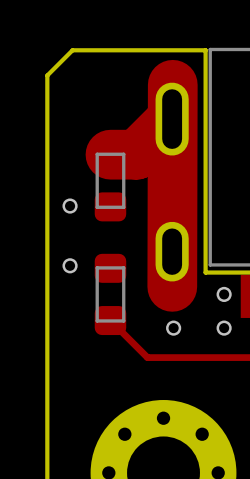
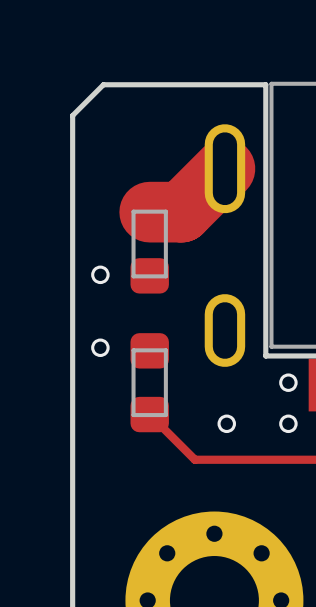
track: (172, 84) (172, 286) -> none

